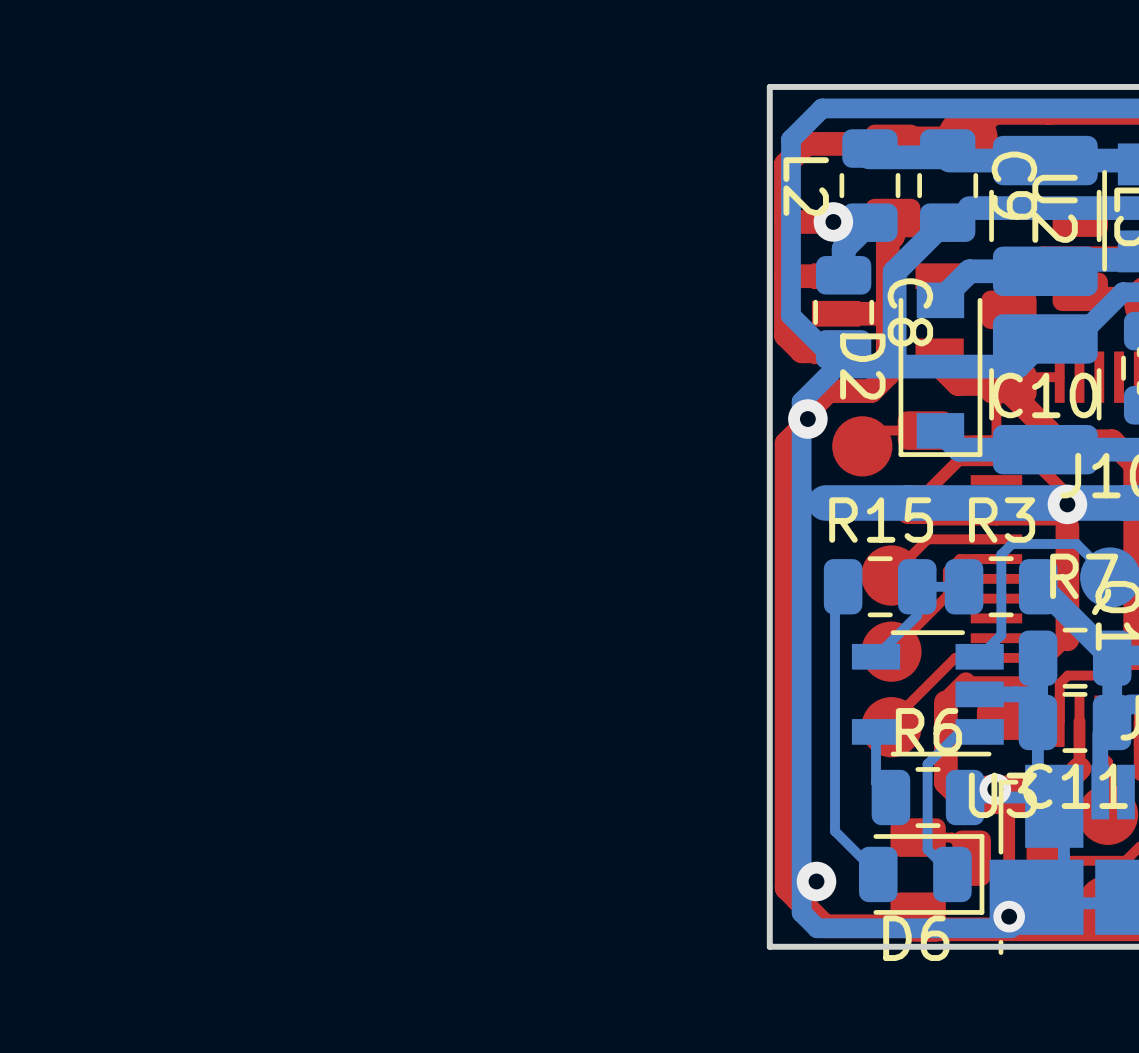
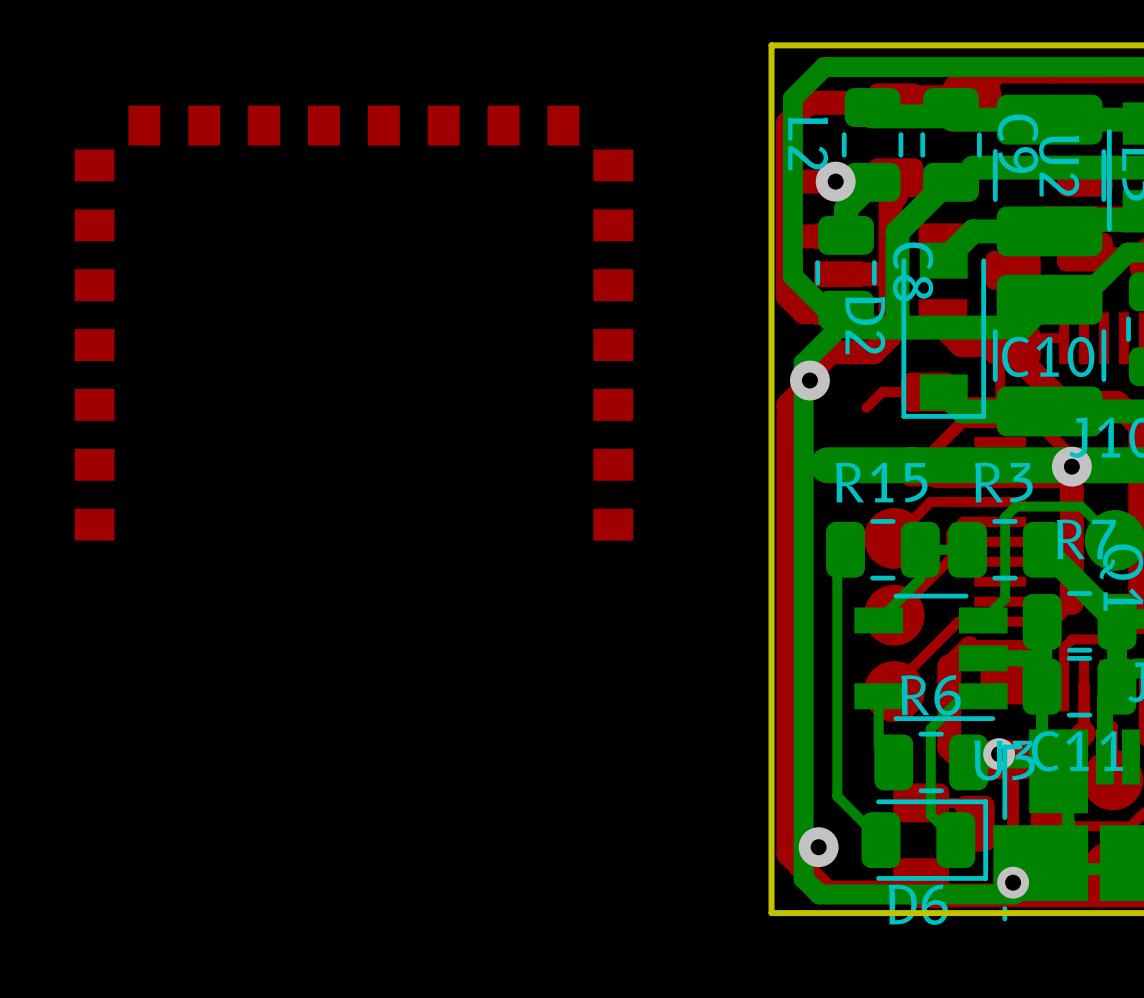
part: none -> (353, 323)
part: (862, 446) -> none

